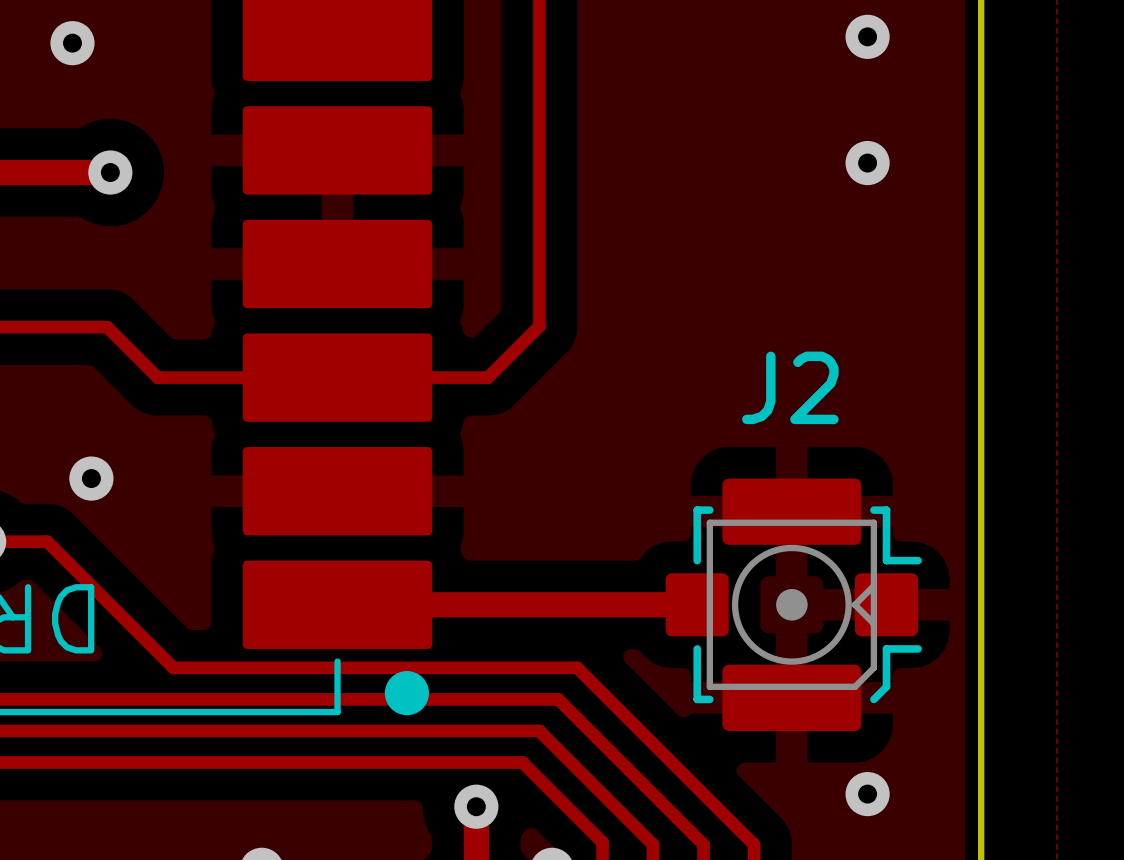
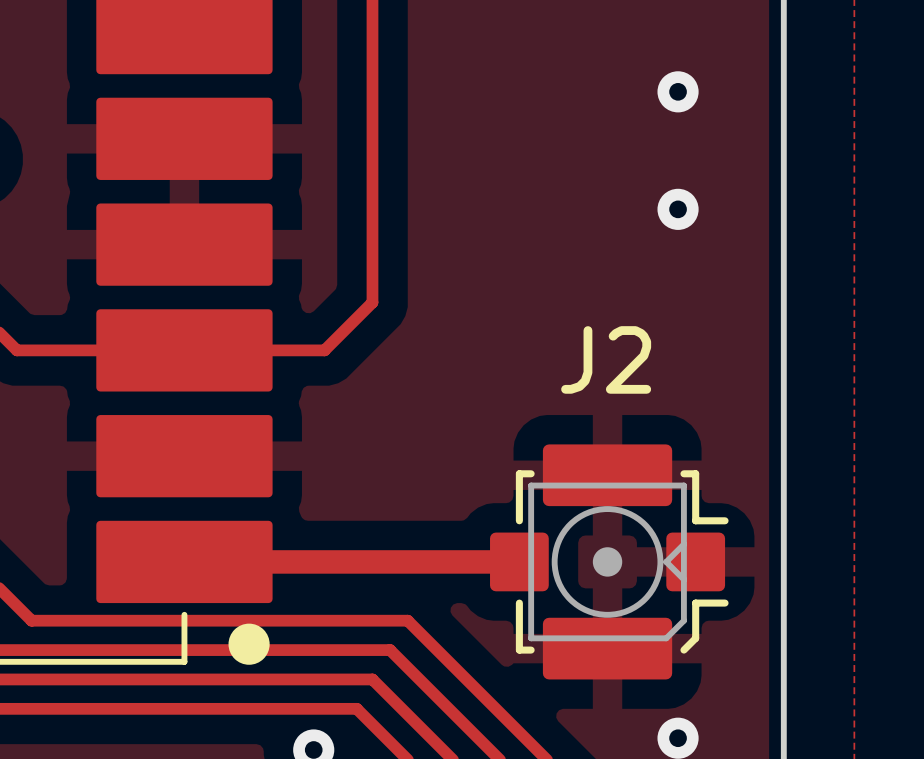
via: (867, 36) -> none
via: none -> (678, 91)
via: (867, 163) -> none
via: none -> (678, 209)

